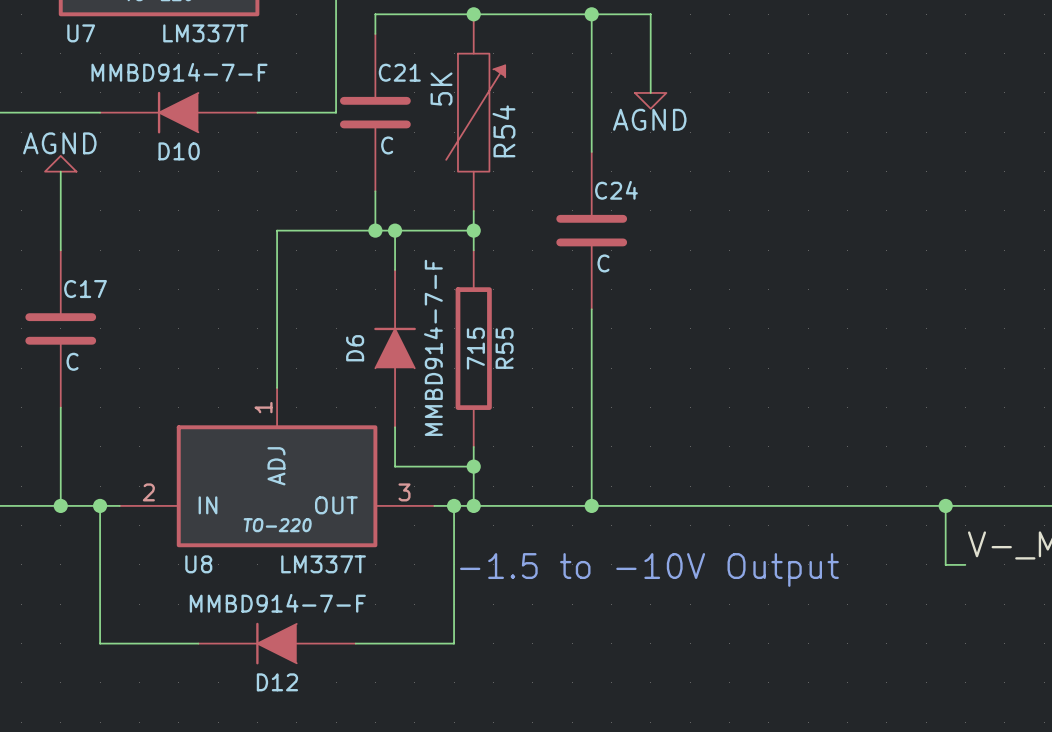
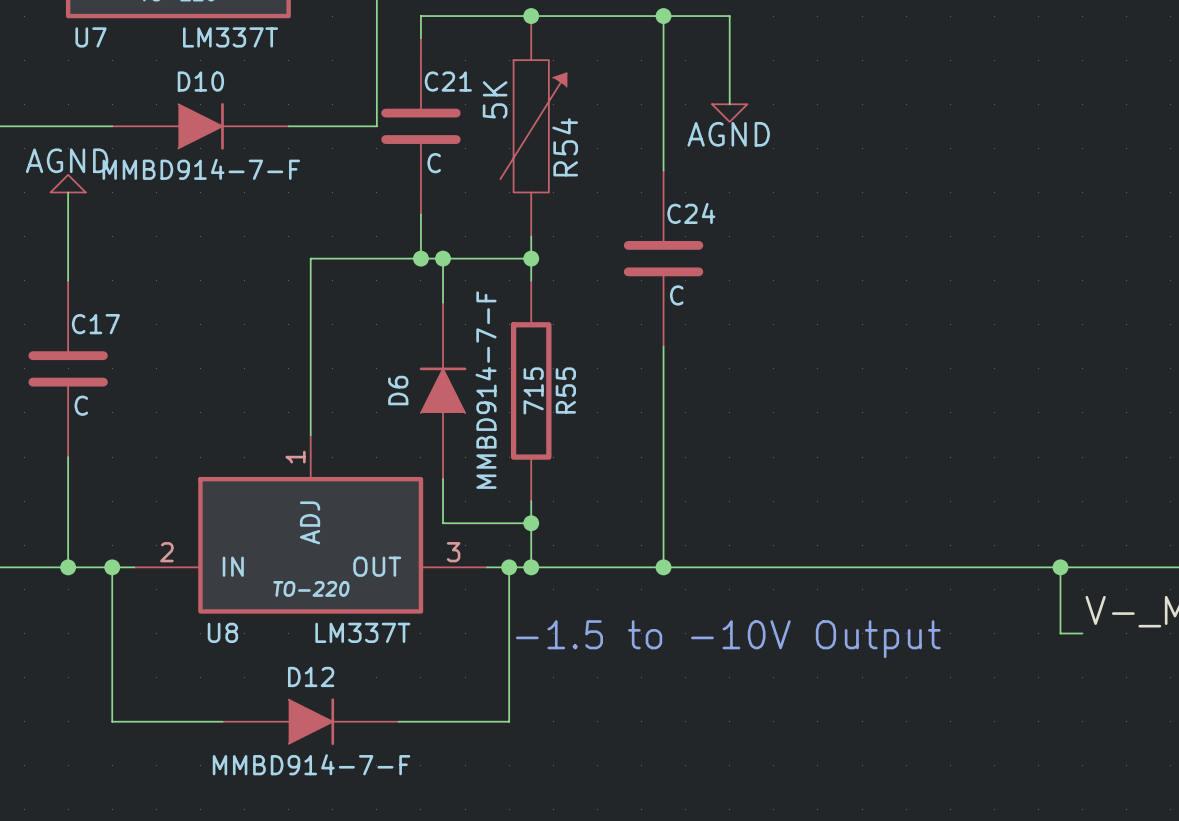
D10 rotation: 0° (178, 112) -> 180° (201, 126)
D12 rotation: 0° (276, 643) -> 180° (311, 721)

